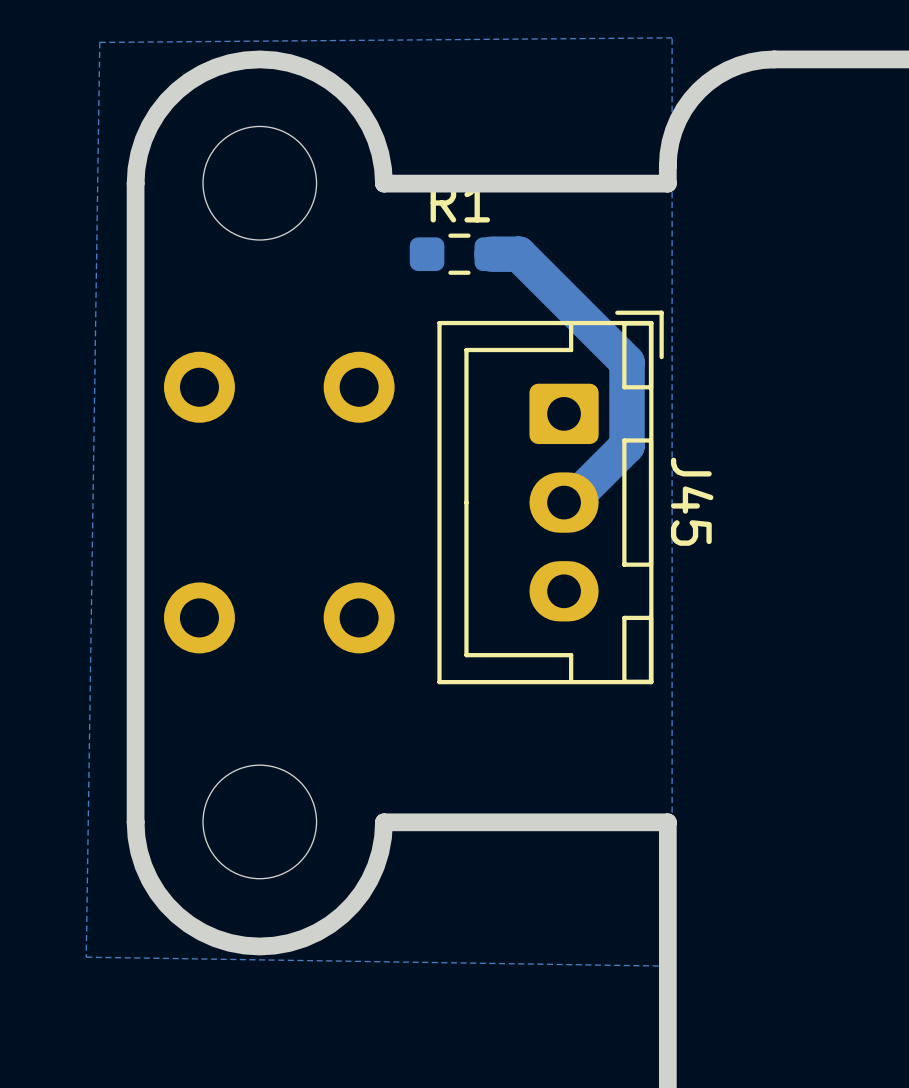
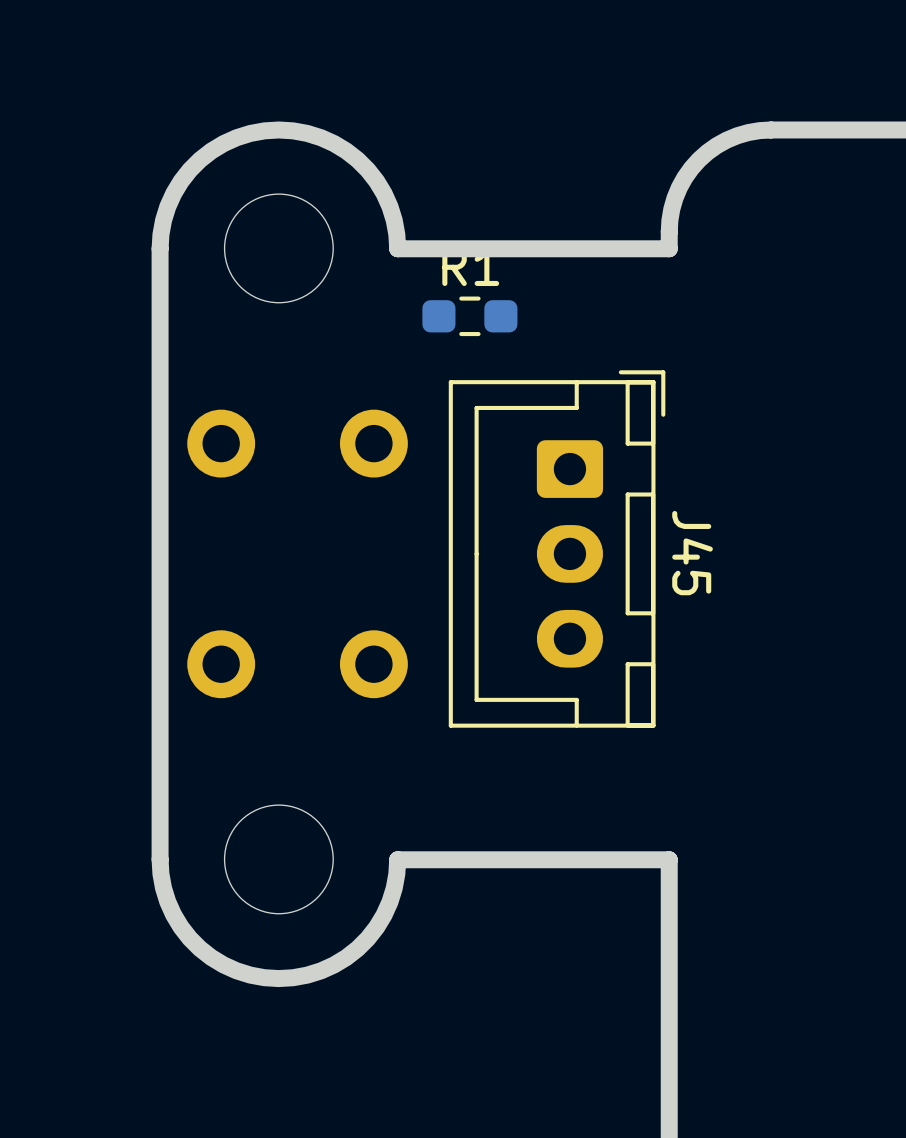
zone outline: (672, 37) (672, 966) (86, 957) (99, 42) (672, 37) -> none
track: (491, 254) (518, 254) (627, 362) (627, 445) (570, 502) (564, 502) -> none

